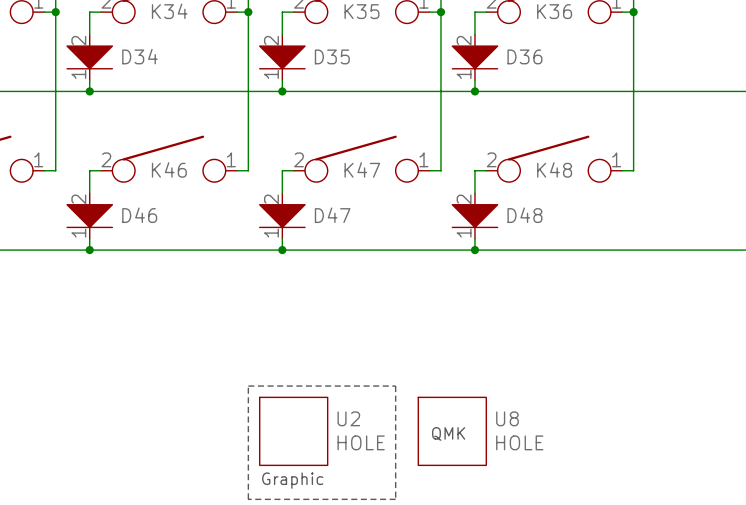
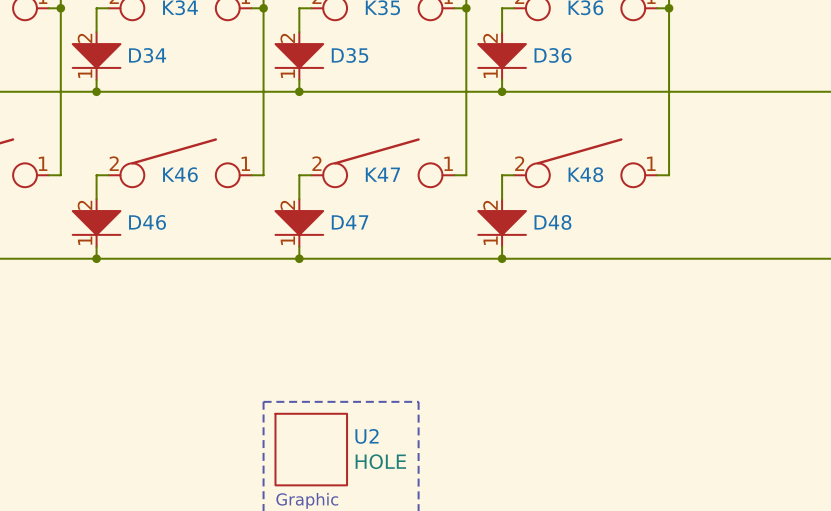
U8: HOLE (452, 431) -> none
text: QMK (448, 433) -> none

